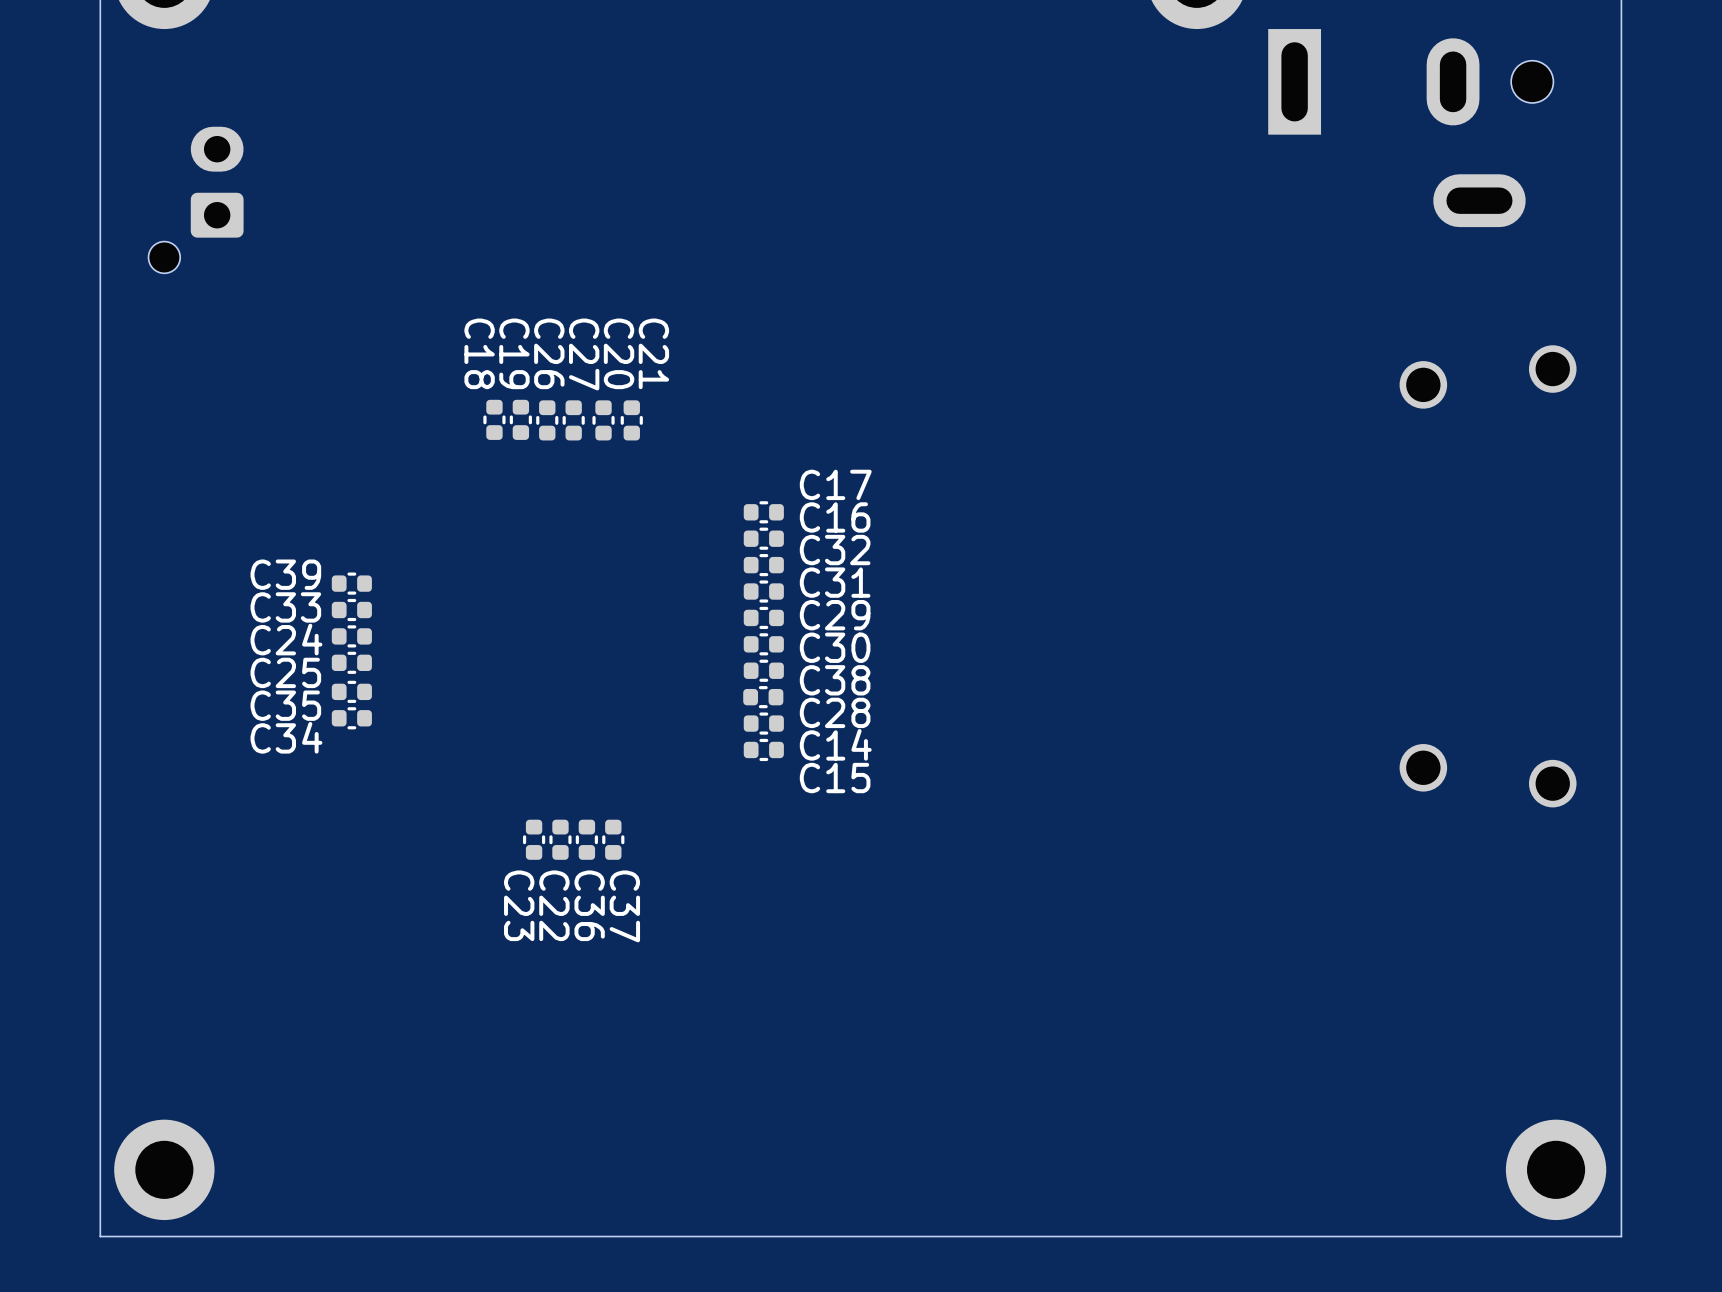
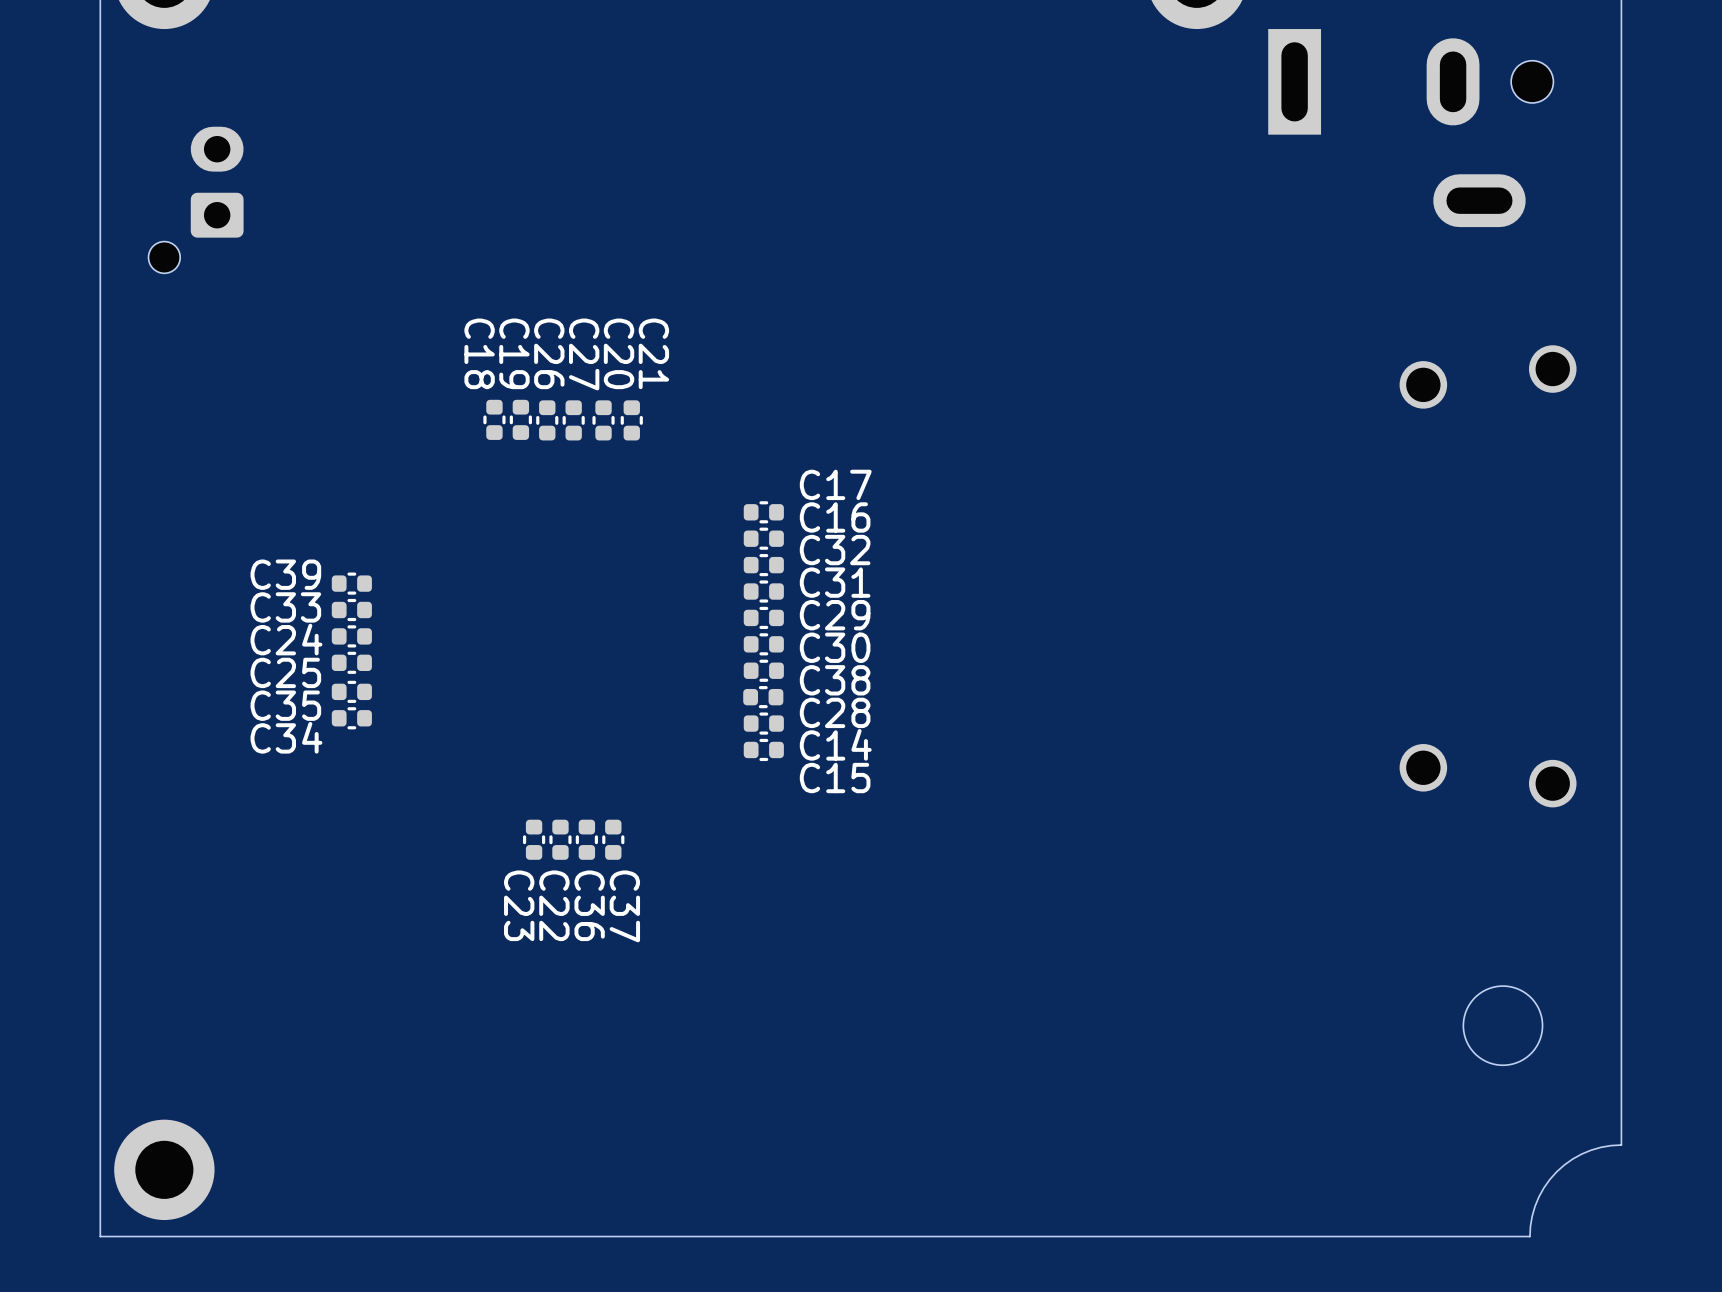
round board edge: none -> [1462, 985, 1544, 1066]
board edge: (1621, 1145) (1621, 1236) (1529, 1236) -> (1621, 1145) (1591, 1150) (1572, 1159) (1556, 1171) (1538, 1196) (1532, 1216) (1529, 1236)
part: (1556, 1169) -> none

